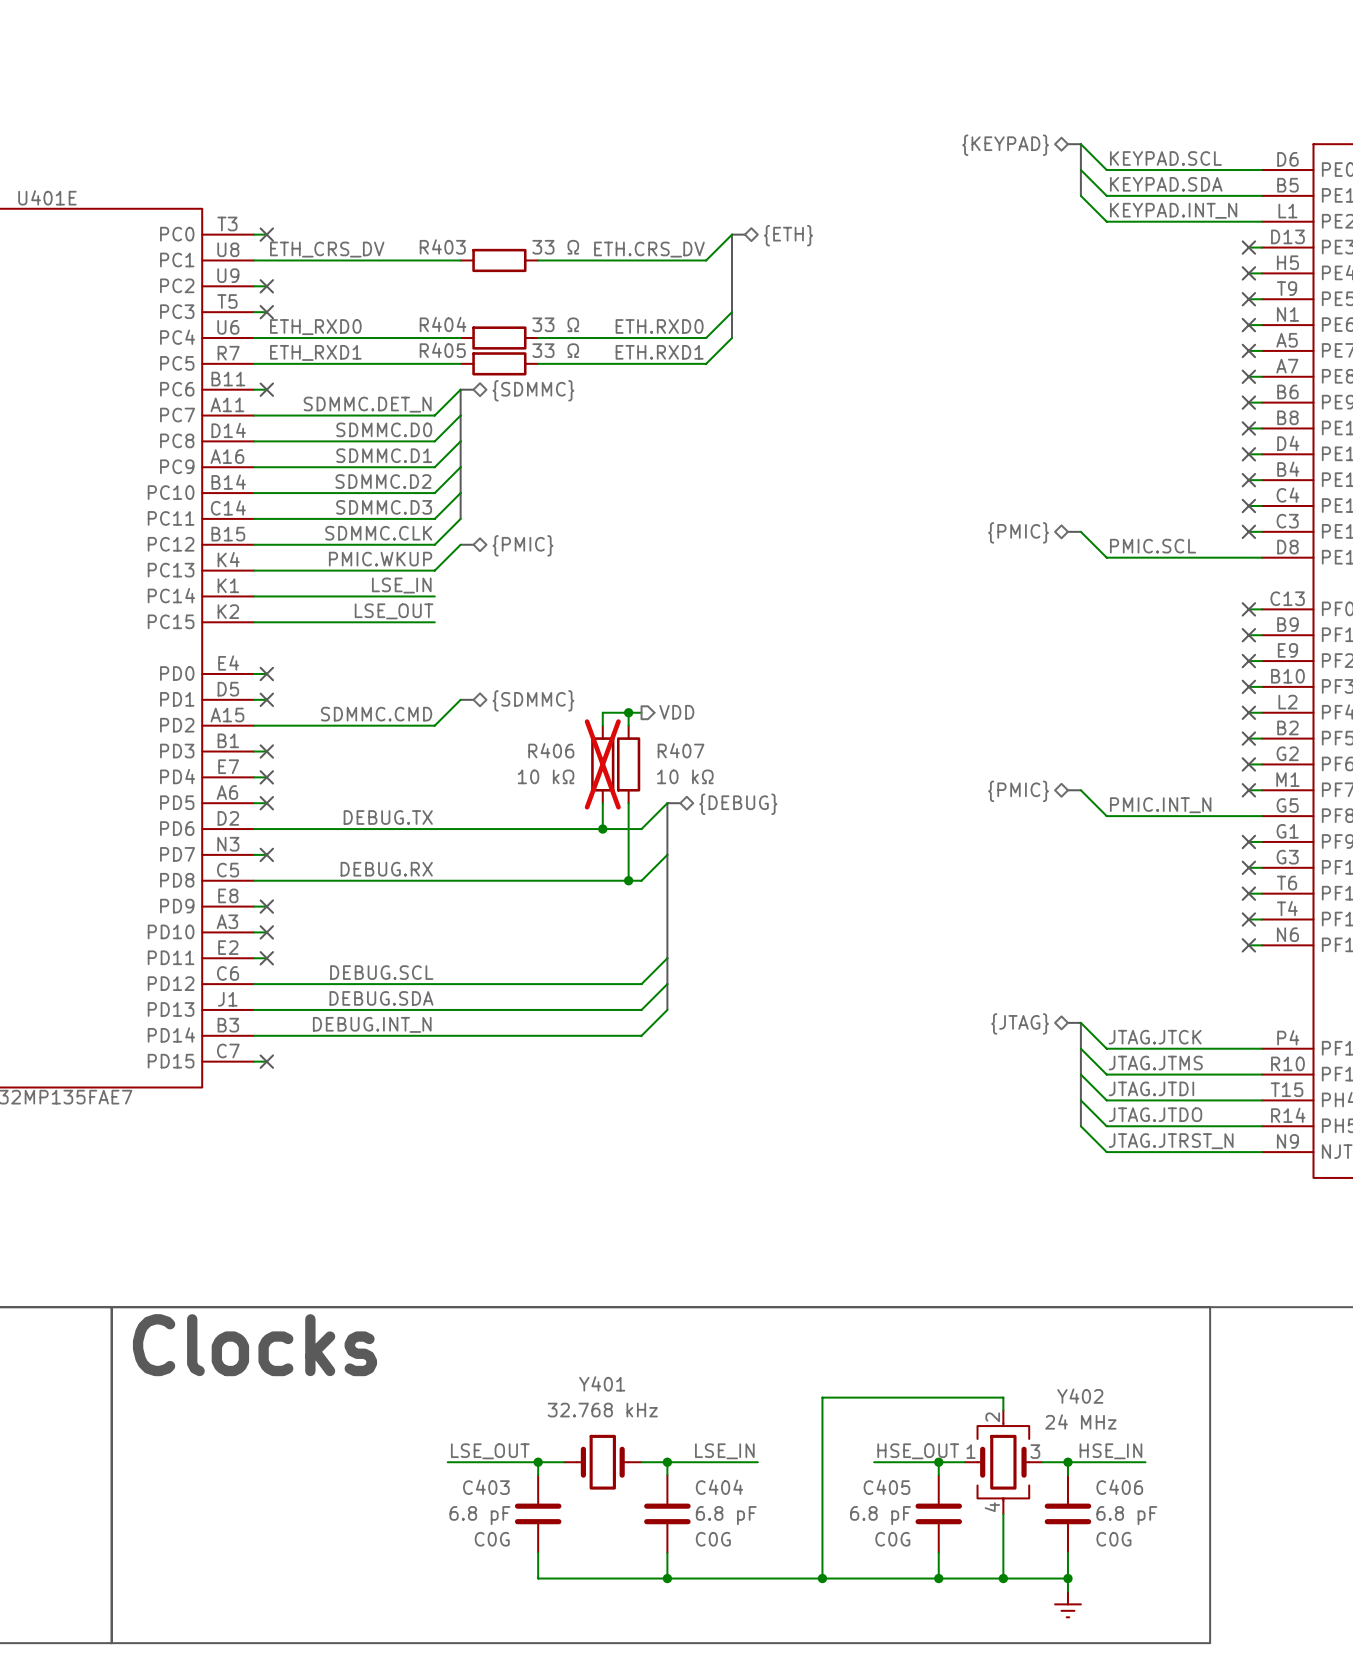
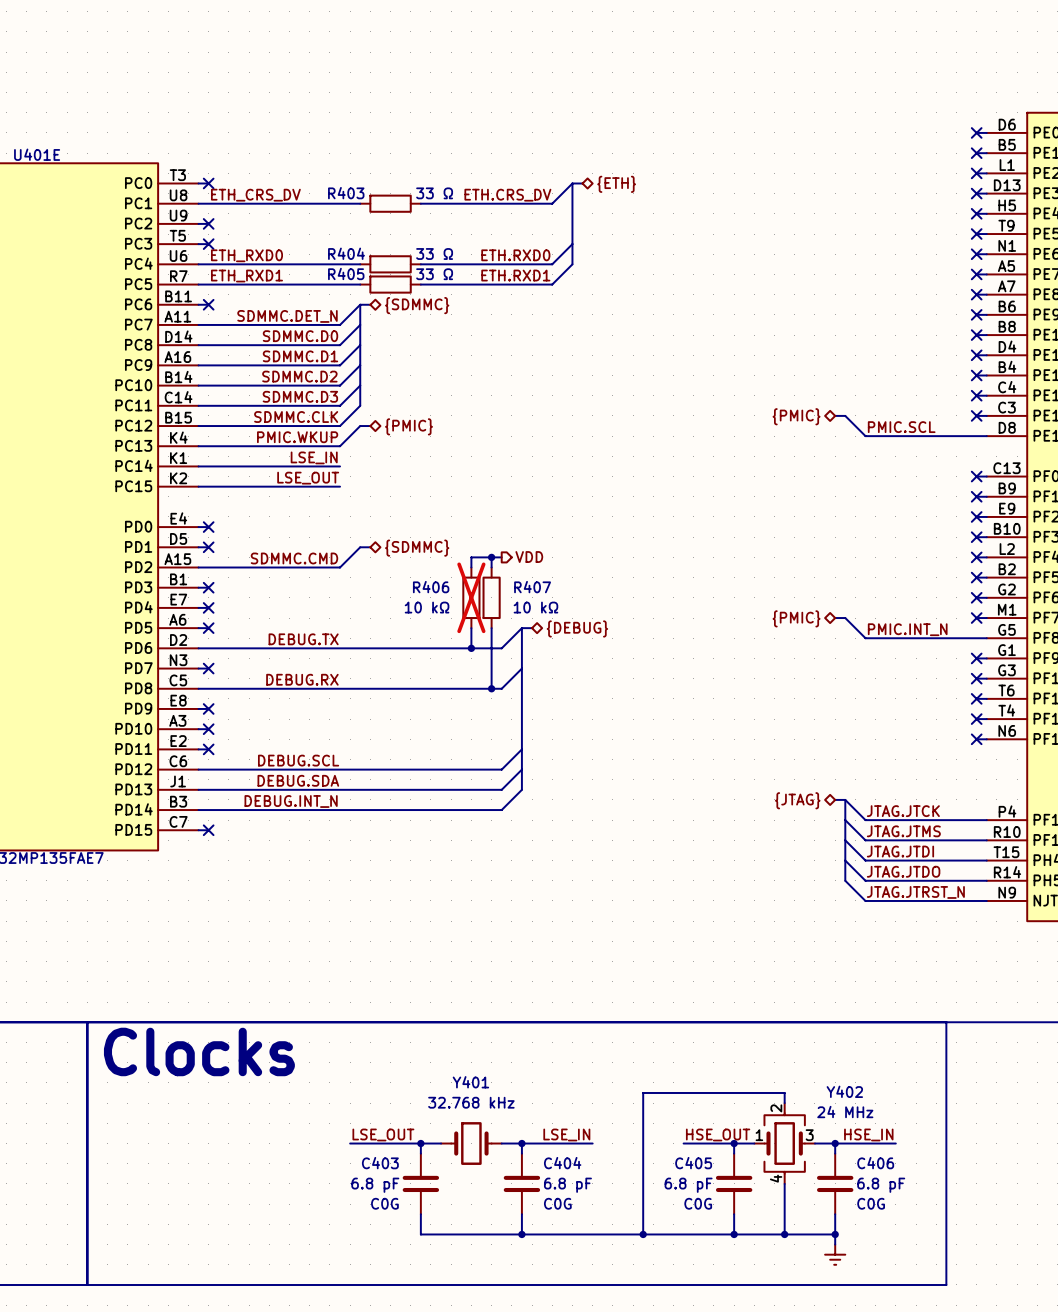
bus: (1067, 144) (1080, 144) (1080, 195) -> none
wire: (1080, 144) (1106, 170) (1248, 170) -> none
hierarchical label: {KEYPAD} (1005, 145) -> none
label: KEYPAD.SCL (1165, 158) -> none
wire: (1080, 170) (1106, 195) (1248, 195) -> none
no-connect mark: none -> (976, 132)
label: KEYPAD.SDA (1166, 184) -> none
wire: (1080, 195) (1106, 221) (1248, 221) -> none
no-connect mark: none -> (976, 153)
label: KEYPAD.INT_N (1173, 210) -> none
no-connect mark: none -> (976, 173)

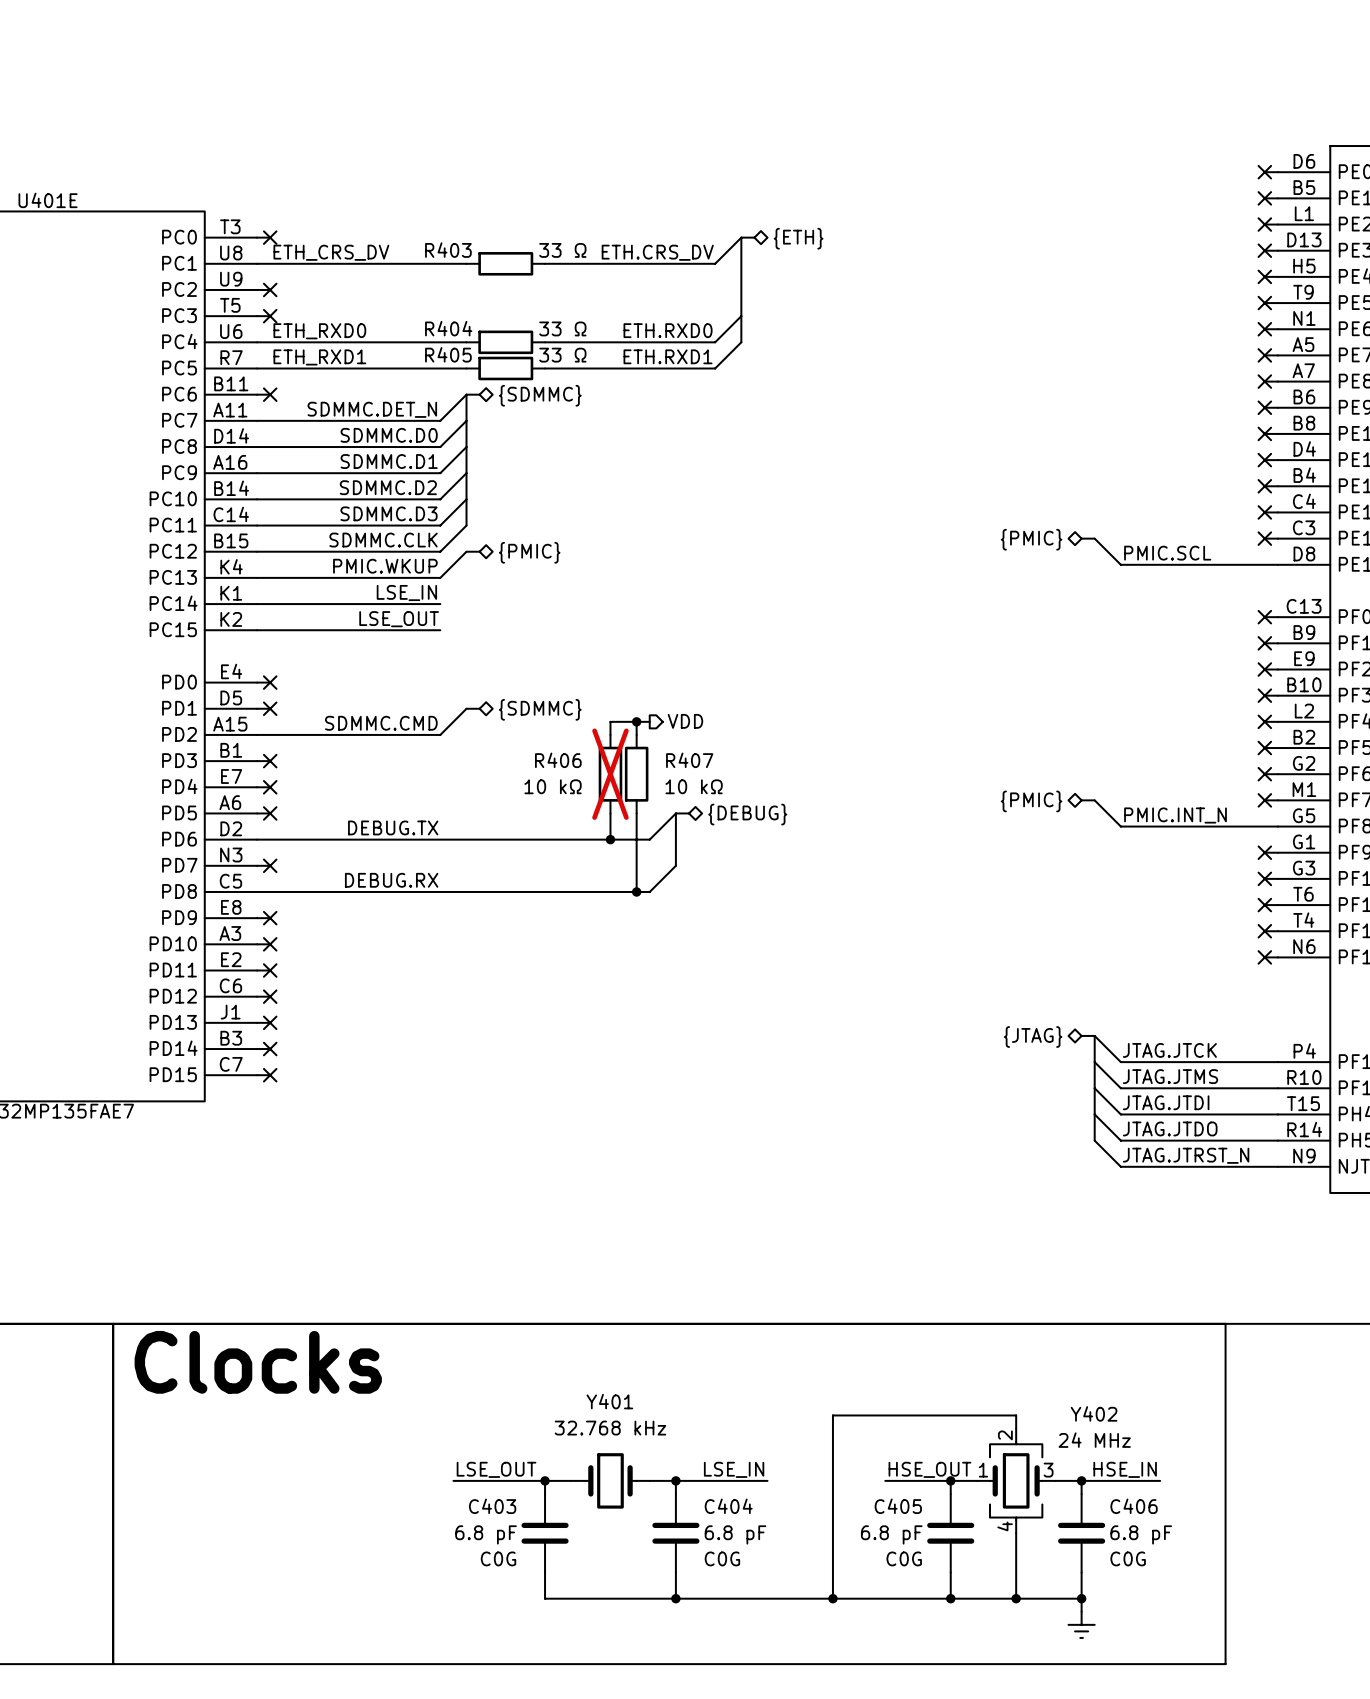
bus: (521, 668) (521, 789) -> none
wire: (521, 749) (501, 769) (208, 769) -> none
label: DEBUG.SCL (298, 760) -> none
no-connect mark: none -> (270, 996)
wire: (521, 769) (501, 789) (208, 789) -> none
label: DEBUG.SDA (298, 780) -> none
no-connect mark: none -> (270, 1022)
wire: (521, 789) (501, 810) (208, 810) -> none
label: DEBUG.INT_N (291, 801) -> none
no-connect mark: none -> (270, 1049)

